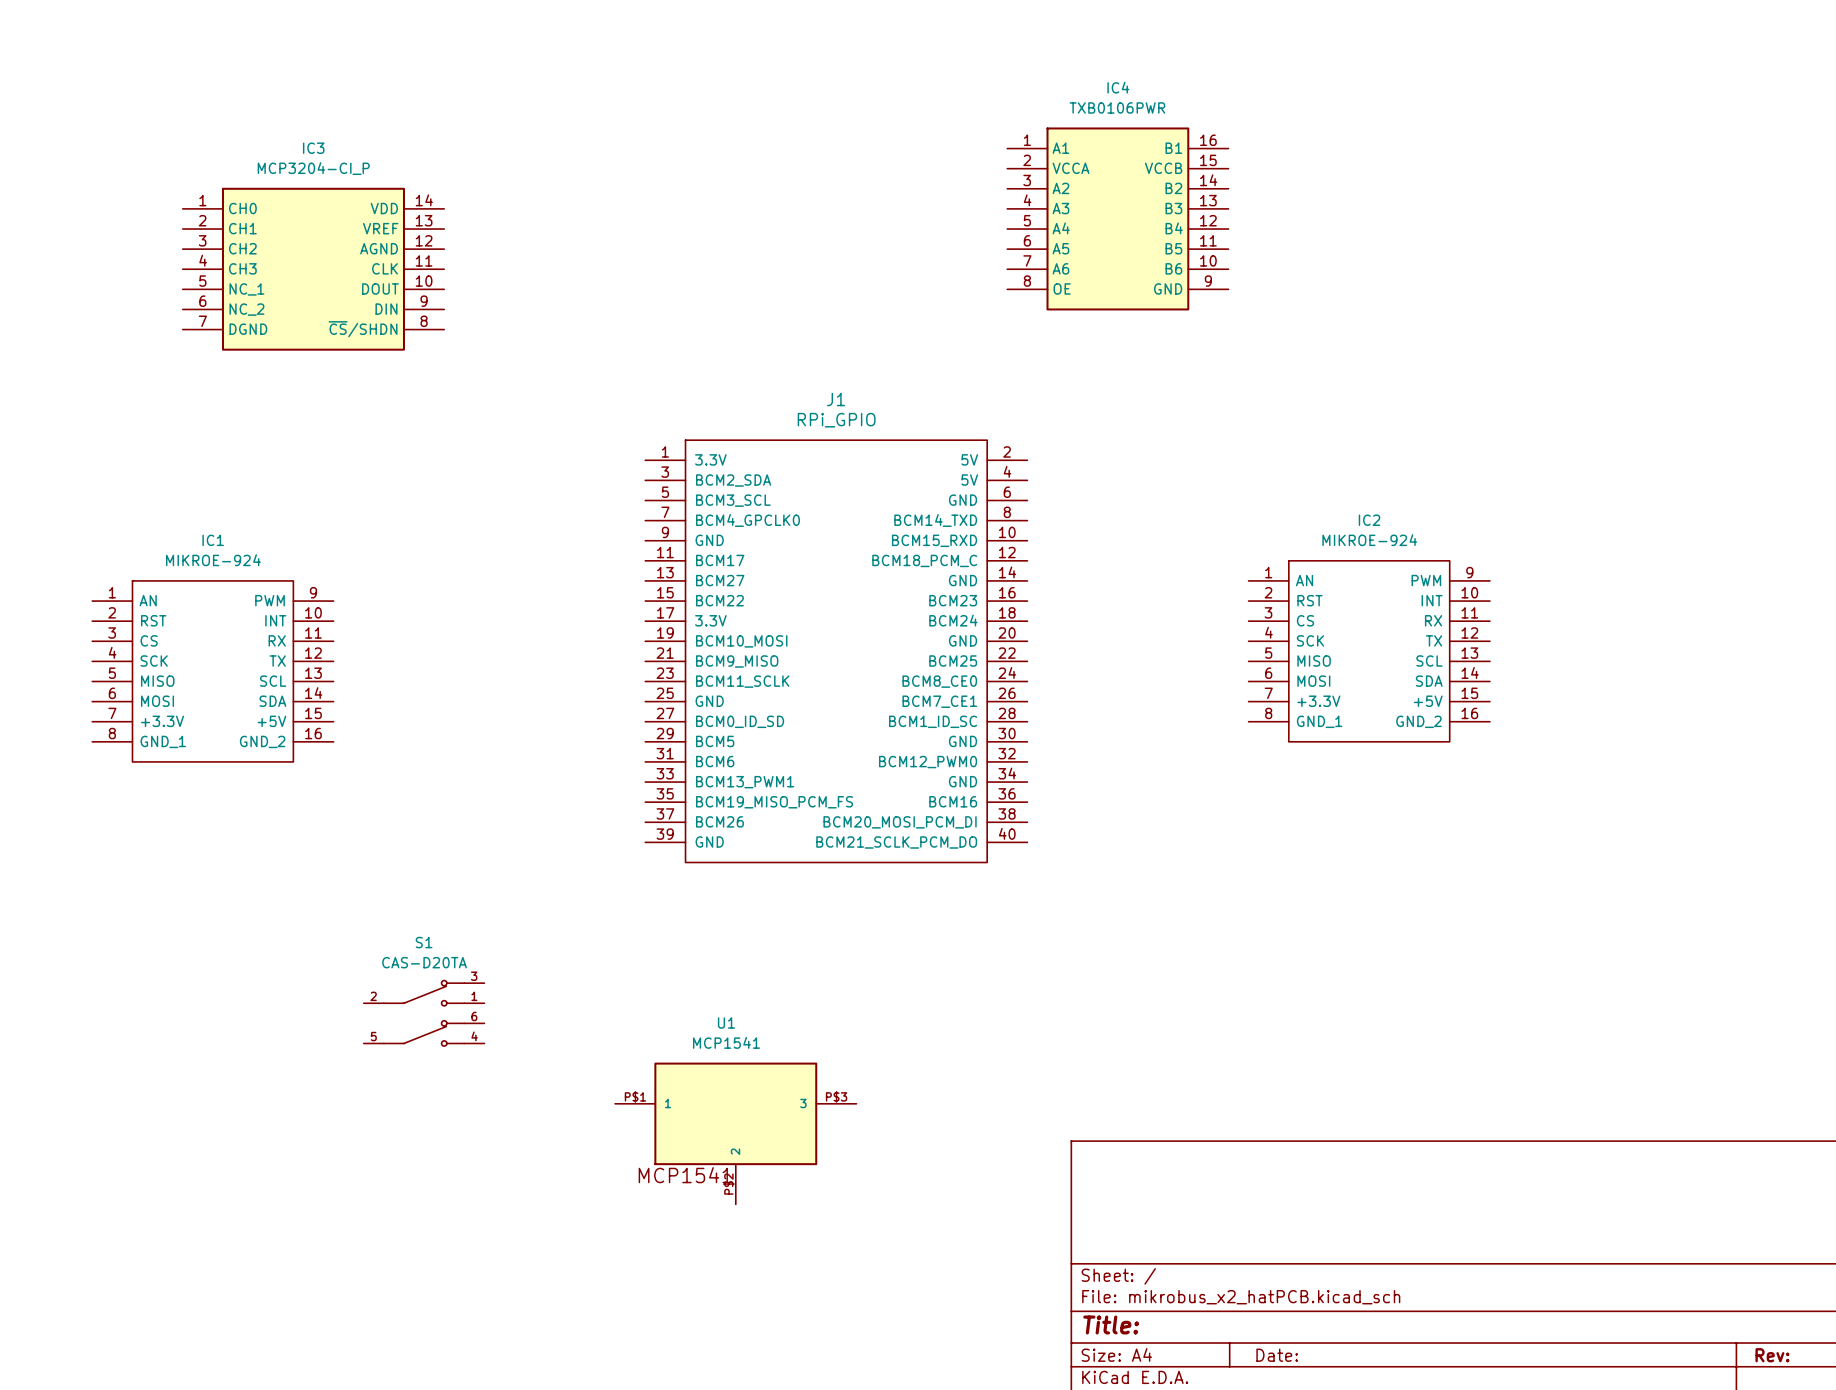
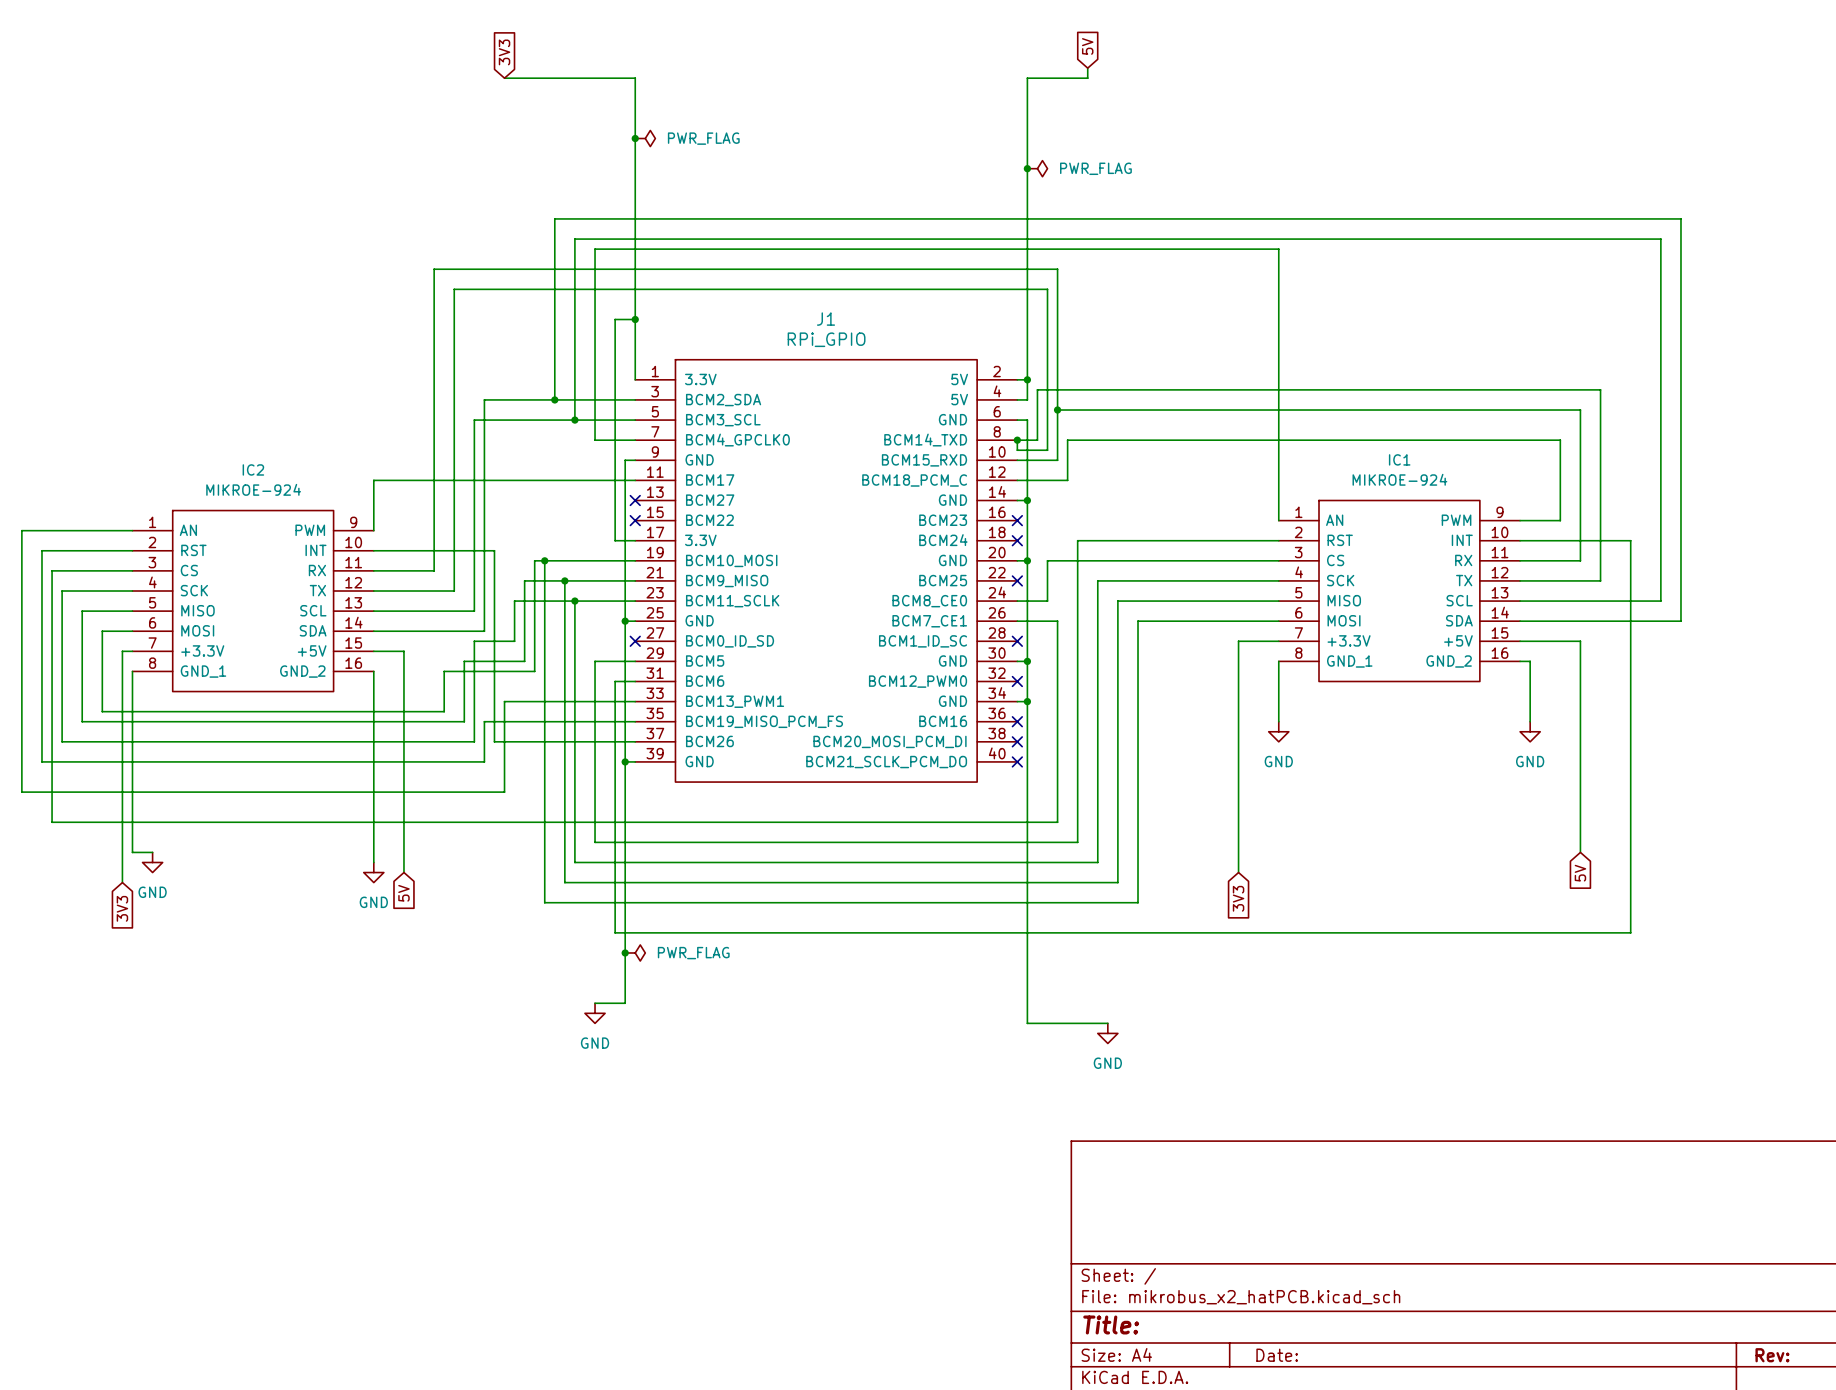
global label: none -> 5V (1087, 46)
global label: none -> 3V3 (504, 52)
wire: none -> (1087, 68) (1087, 78) (1027, 78) (1027, 399) (1017, 399)
wire: none -> (504, 78) (635, 78) (635, 379)
junction: none -> (635, 138)
power symbol: none -> PWR_FLAG (645, 138)
junction: none -> (1027, 168)
power symbol: none -> PWR_FLAG (1037, 168)
IC4: TXB0106PWR (1117, 218) -> none
IC3: MCP3204-CI_P (313, 269) -> none
wire: none -> (635, 319) (615, 319) (615, 540) (635, 540)
junction: none -> (635, 319)
wire: none -> (1017, 379) (1027, 379)
junction: none -> (1027, 379)
wire: none -> (554, 399) (554, 218) (1680, 218) (1680, 621) (1520, 621)
junction: none -> (554, 399)
wire: none -> (635, 399) (484, 399) (484, 631) (373, 631)
wire: none -> (1057, 410) (1580, 410) (1580, 560) (1520, 560)
junction: none -> (1057, 410)
wire: none -> (574, 420) (574, 239) (1660, 239) (1660, 601) (1520, 601)
junction: none -> (574, 420)
wire: none -> (635, 420) (474, 420) (474, 611) (373, 611)
wire: none -> (1017, 420) (1027, 420) (1027, 1023) (1107, 1023)
wire: none -> (635, 440) (595, 440) (595, 249) (1278, 249) (1278, 520)
junction: none -> (1017, 440)
wire: none -> (635, 460) (625, 460) (625, 1003) (595, 1003)
wire: none -> (1017, 460) (1057, 460) (1057, 269) (434, 269) (434, 570) (373, 570)
wire: none -> (635, 480) (373, 480) (373, 530)
wire: none -> (1017, 480) (1067, 480) (1067, 440) (1560, 440) (1560, 520) (1520, 520)
no-connect mark: none -> (635, 500)
junction: none -> (1027, 500)
no-connect mark: none -> (635, 520)
no-connect mark: none -> (1017, 520)
wire: none -> (132, 530) (21, 530) (21, 792) (504, 792) (504, 701) (635, 701)
no-connect mark: none -> (1017, 540)
wire: none -> (1278, 540) (1077, 540) (1077, 842) (595, 842) (595, 661) (635, 661)
wire: none -> (1520, 540) (1630, 540) (1630, 932) (615, 932) (615, 681) (635, 681)
wire: none -> (132, 550) (41, 550) (41, 761) (484, 761) (484, 721) (635, 721)
wire: none -> (373, 550) (494, 550) (494, 741) (635, 741)
wire: none -> (544, 560) (544, 902) (1138, 902) (1138, 621) (1278, 621)
junction: none -> (544, 560)
wire: none -> (635, 560) (534, 560) (534, 671) (444, 671) (444, 711) (102, 711) (102, 631) (132, 631)
junction: none -> (1027, 560)
wire: none -> (1278, 560) (1047, 560) (1047, 601) (1017, 601)
wire: none -> (132, 570) (52, 570) (52, 822) (1057, 822) (1057, 621) (1017, 621)
wire: none -> (564, 580) (564, 882) (1117, 882) (1117, 601) (1278, 601)
junction: none -> (564, 580)
wire: none -> (635, 580) (524, 580) (524, 661) (464, 661) (464, 721) (82, 721) (82, 611) (132, 611)
no-connect mark: none -> (1017, 580)
wire: none -> (1278, 580) (1097, 580) (1097, 862) (574, 862) (574, 601)
wire: none -> (1520, 580) (1600, 580) (1600, 389) (1037, 389) (1037, 440) (1017, 440) (1017, 450) (1047, 450) (1047, 289) (454, 289) (454, 591) (373, 591)
wire: none -> (132, 591) (62, 591) (62, 741) (474, 741) (474, 641) (514, 641) (514, 601) (635, 601)
junction: none -> (574, 601)
wire: none -> (625, 621) (635, 621)
junction: none -> (625, 621)
no-connect mark: none -> (635, 641)
no-connect mark: none -> (1017, 641)
wire: none -> (1278, 641) (1238, 641) (1238, 872)
wire: none -> (1520, 641) (1580, 641) (1580, 852)
wire: none -> (132, 651) (122, 651) (122, 882)
wire: none -> (373, 651) (403, 651) (403, 872)
J1 position: (836, 651) -> (826, 570)
IC2 position: (1369, 651) -> (253, 601)
junction: none -> (1027, 661)
wire: none -> (1278, 661) (1278, 721)
wire: none -> (1520, 661) (1530, 661) (1530, 721)
wire: none -> (132, 671) (132, 852) (152, 852)
IC1 position: (212, 671) -> (1399, 591)
wire: none -> (373, 671) (373, 862)
no-connect mark: none -> (1017, 681)
junction: none -> (1027, 701)
no-connect mark: none -> (1017, 721)
power symbol: none -> GND (1278, 731)
power symbol: none -> GND (1530, 731)
no-connect mark: none -> (1017, 741)
wire: none -> (625, 761) (635, 761)
junction: none -> (625, 761)
no-connect mark: none -> (1017, 761)
power symbol: none -> GND (152, 862)
power symbol: none -> GND (373, 872)
global label: none -> 5V (1580, 873)
global label: none -> 5V (403, 893)
global label: none -> 3V3 (1238, 898)
global label: none -> 3V3 (122, 908)
junction: none -> (625, 952)
power symbol: none -> PWR_FLAG (635, 952)
S1: CAS-D20TA (424, 1013) -> none
power symbol: none -> GND (595, 1013)
power symbol: none -> GND (1107, 1033)
U1: MCP1541 (735, 1133) -> none

